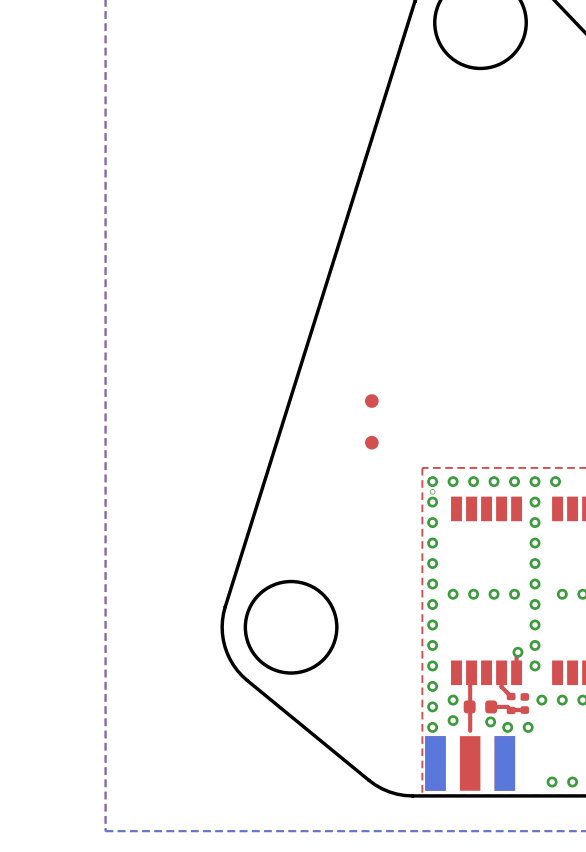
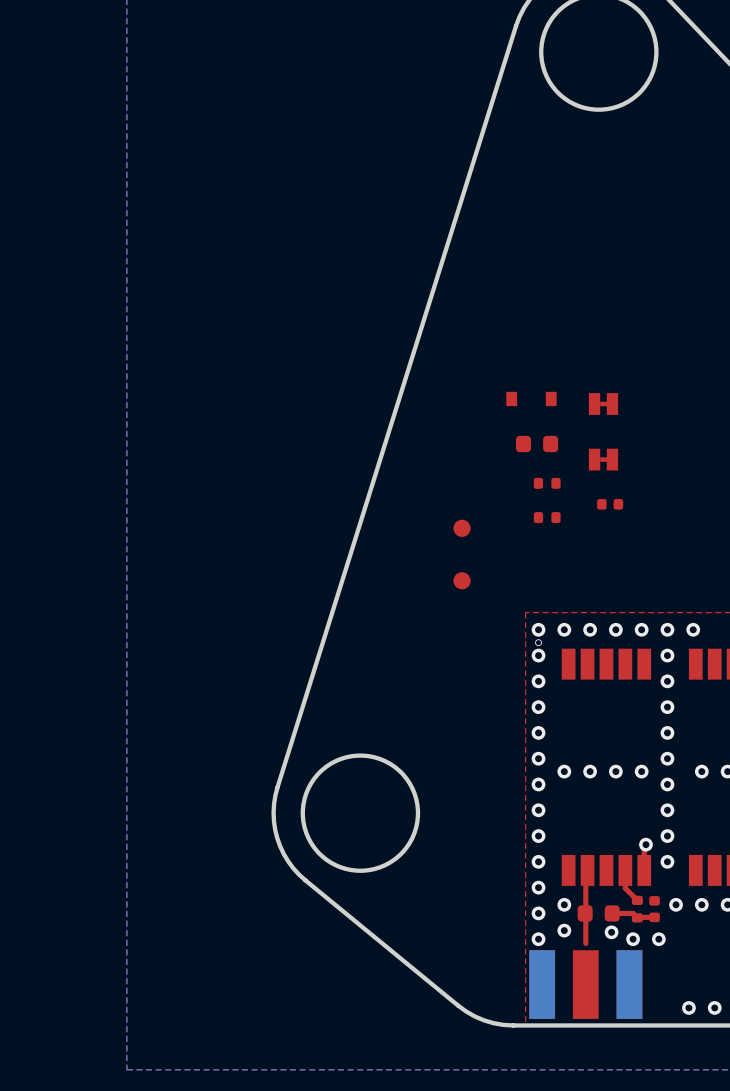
part: none -> (531, 398)
part: none -> (603, 403)
part: none -> (537, 444)
part: none -> (603, 459)
part: none -> (547, 483)
part: none -> (610, 504)
part: none -> (547, 517)

